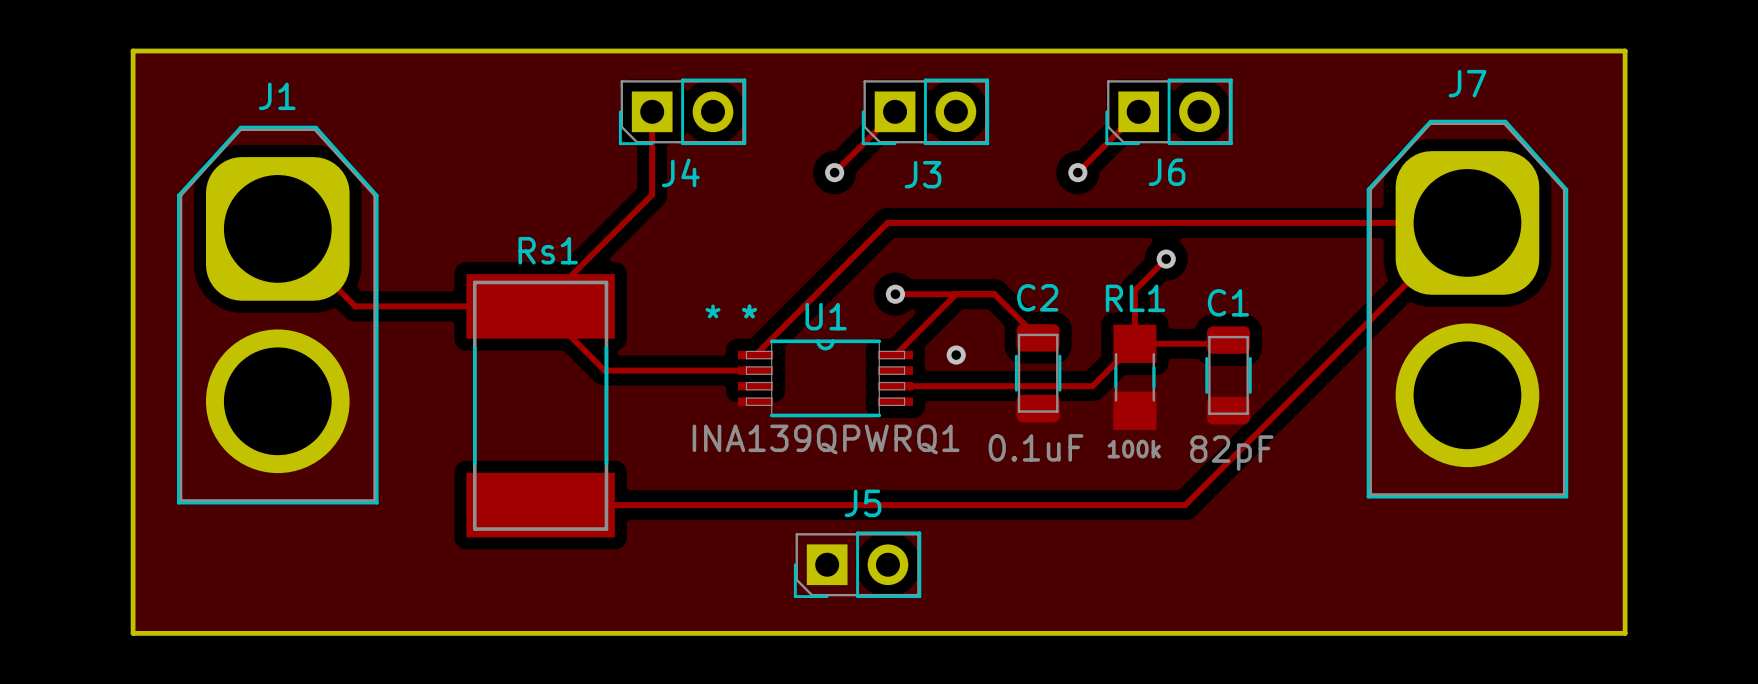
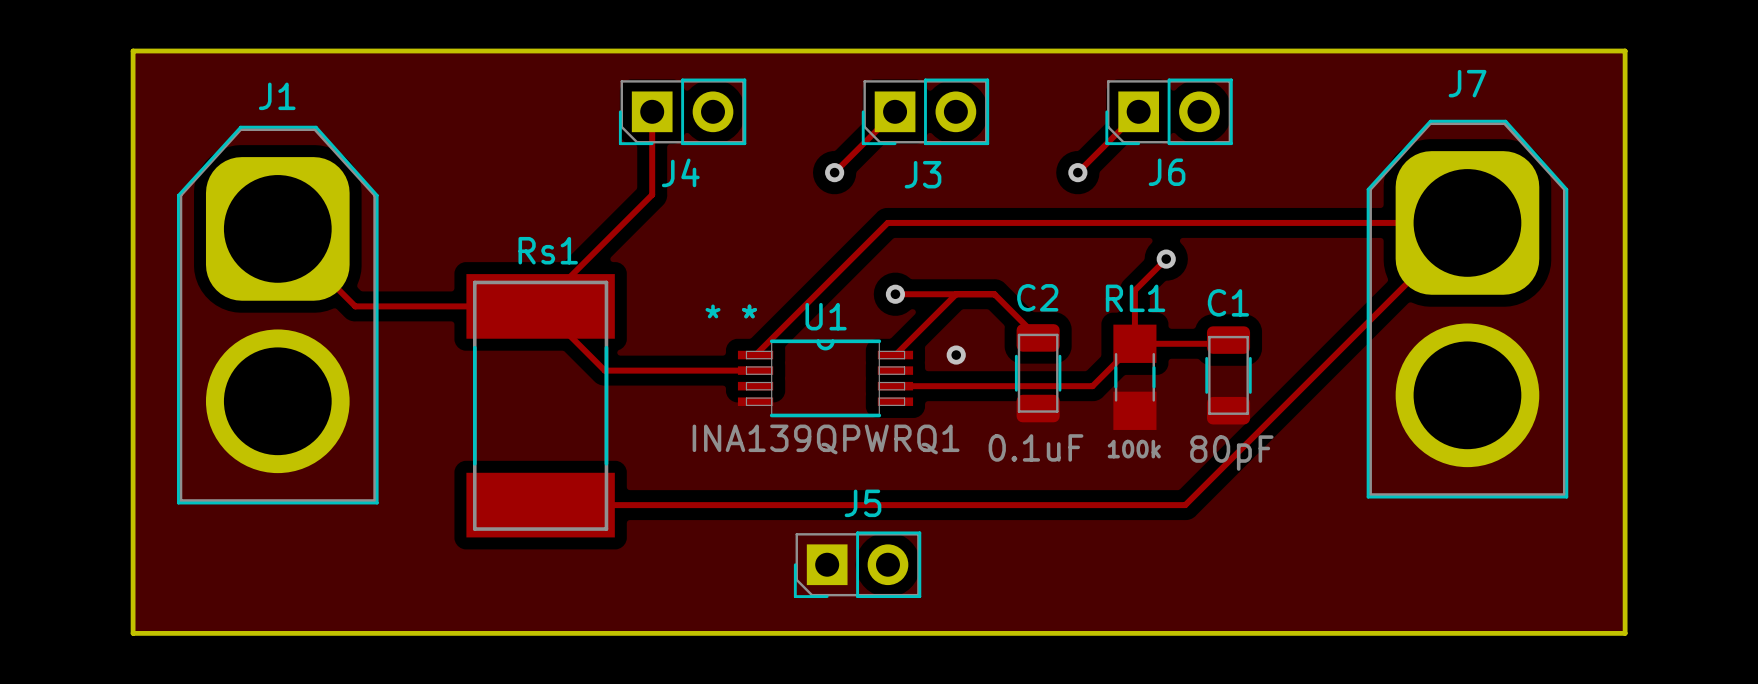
C1 value: 82pF (1231, 453) -> 80pF (1231, 453)

